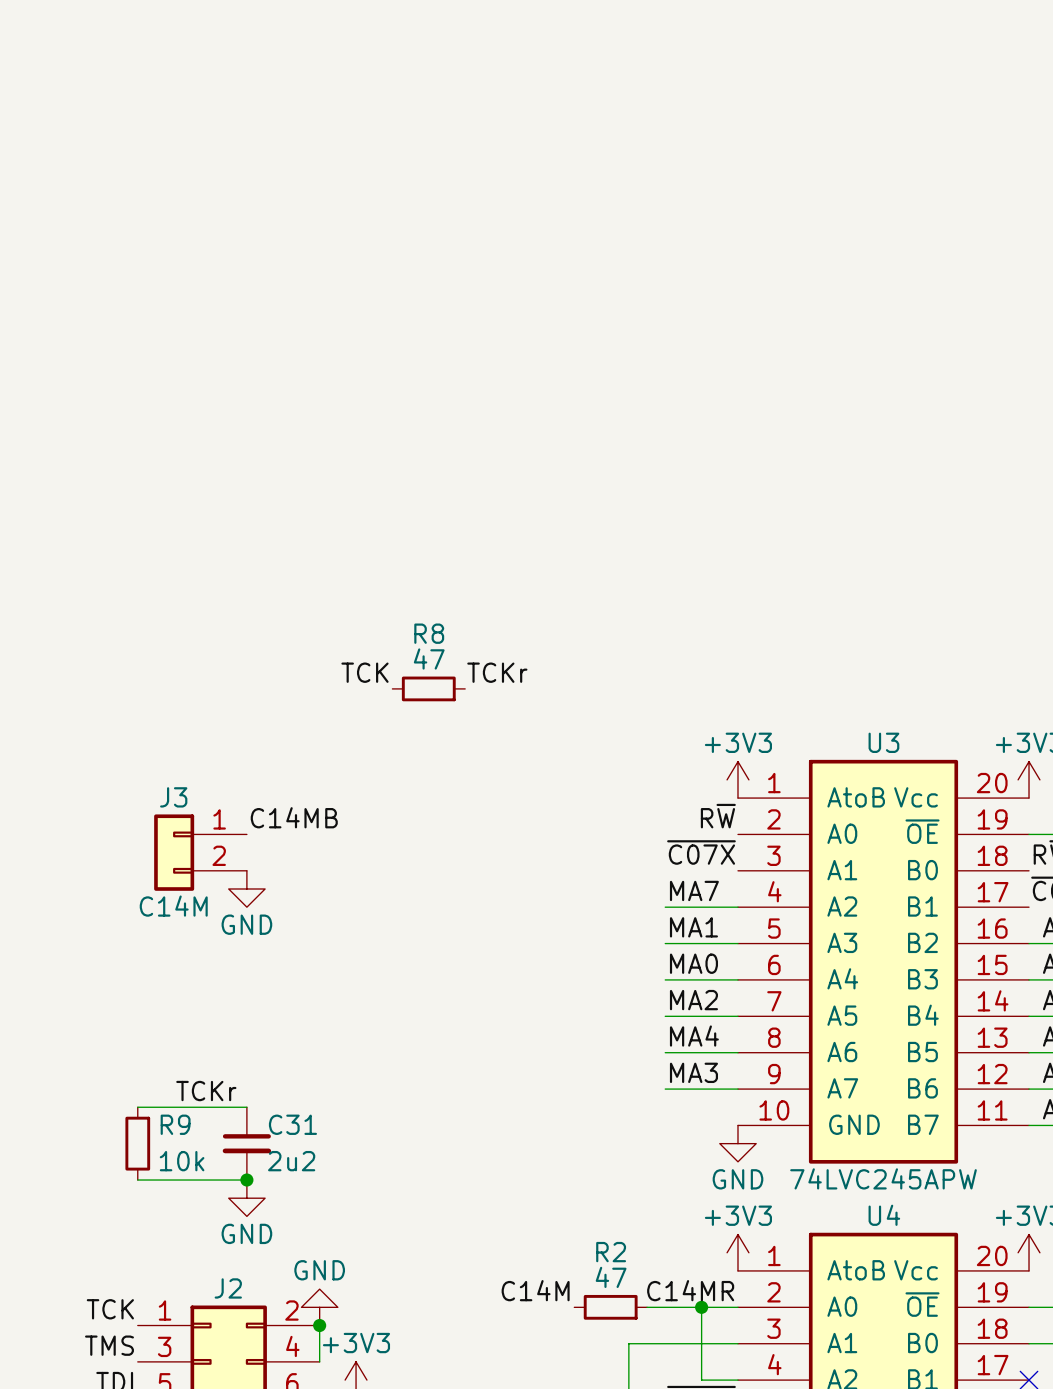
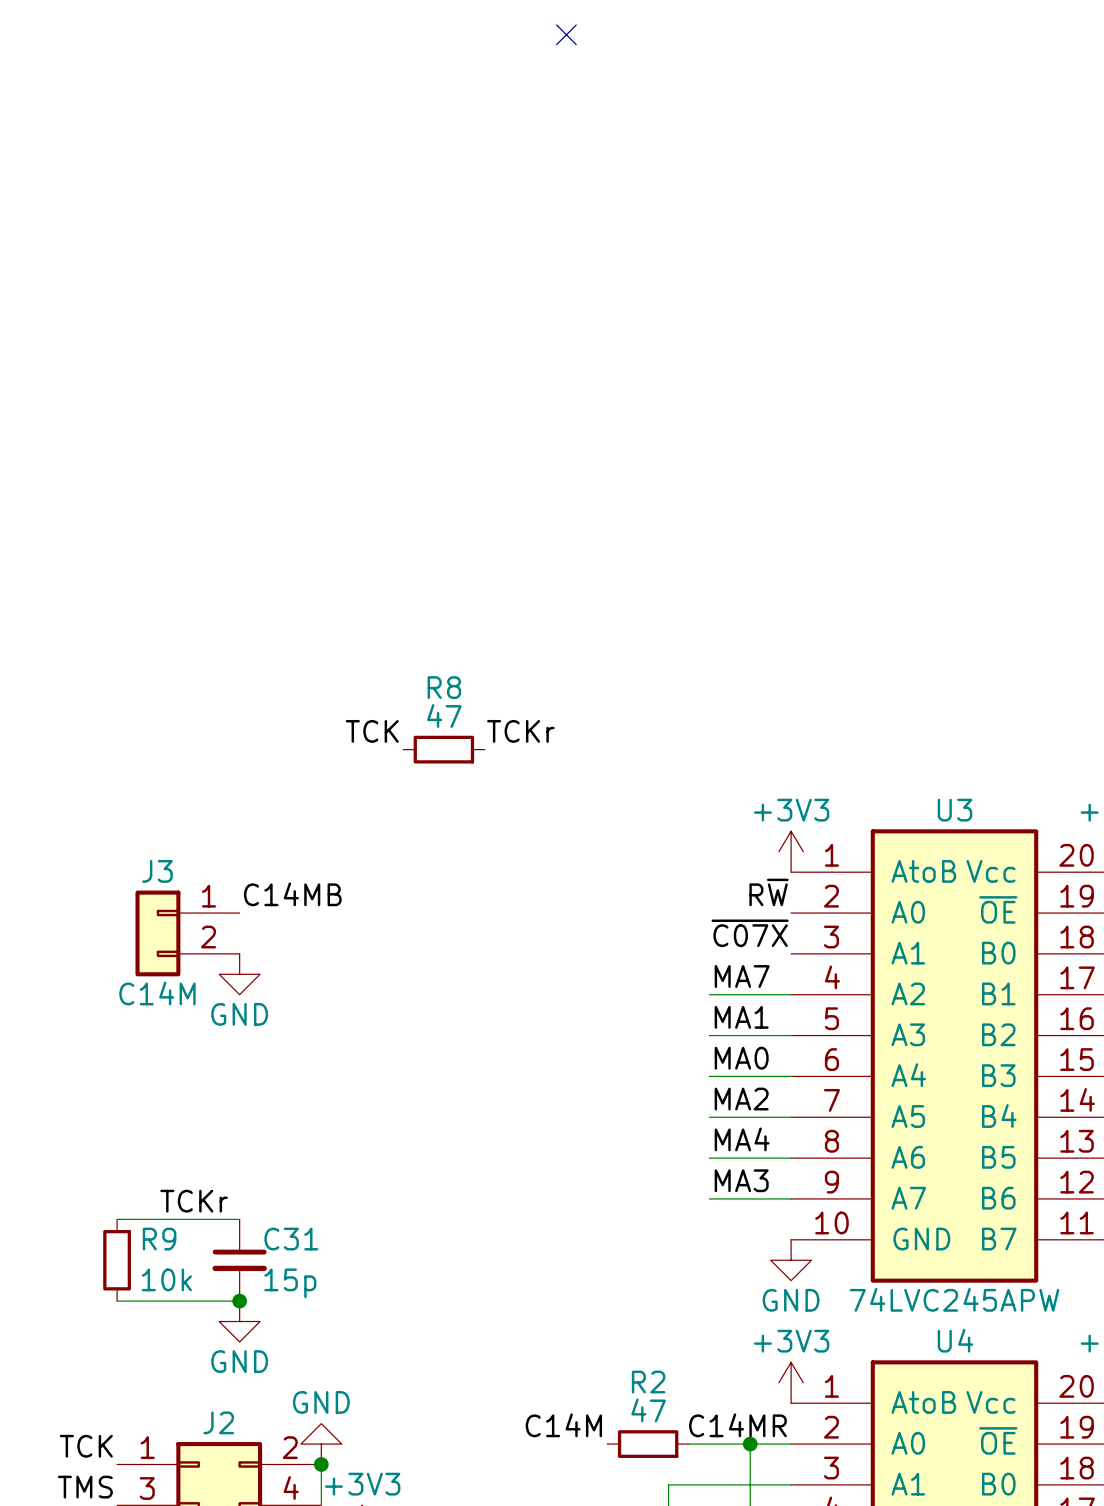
no-connect mark: none -> (566, 34)
C31 value: 2u2 (291, 1161) -> 15p (290, 1283)

